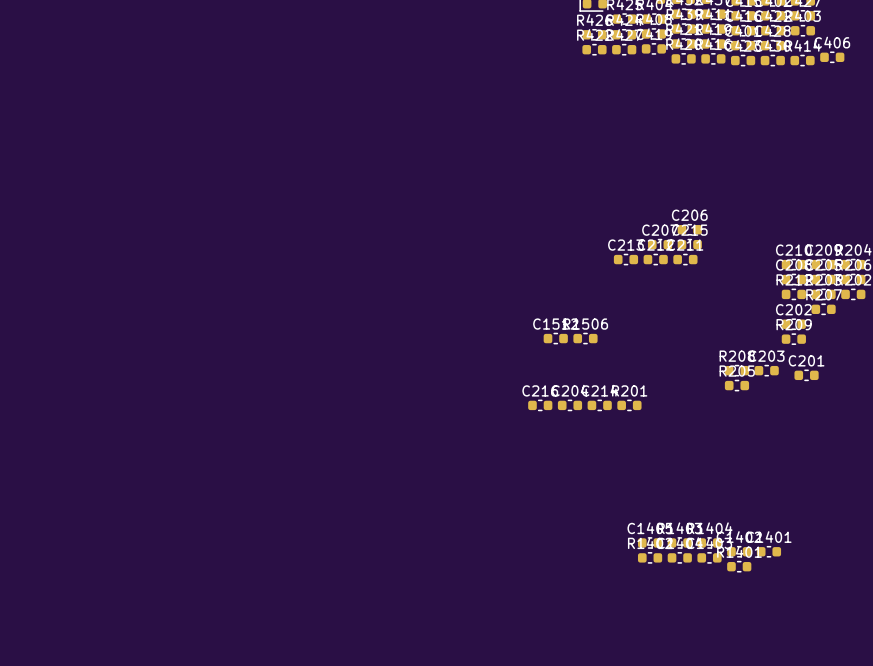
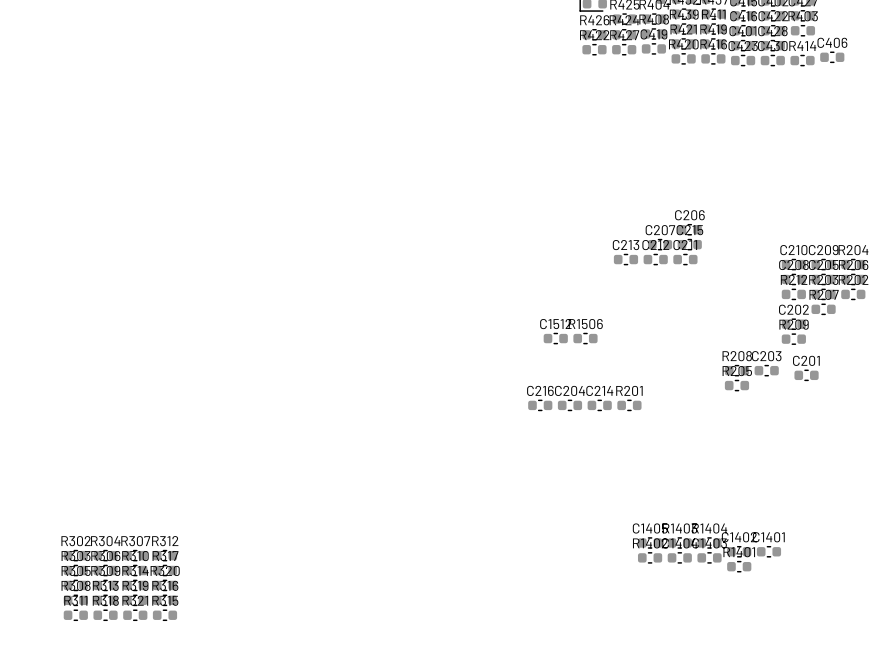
R302: none -> (75, 555)
R304: none -> (105, 555)
R307: none -> (135, 555)
R312: none -> (164, 555)
R303: none -> (75, 570)
R306: none -> (105, 570)
R310: none -> (135, 570)
R317: none -> (164, 570)
R305: none -> (75, 585)
R309: none -> (105, 585)
R314: none -> (135, 585)
R320: none -> (164, 585)
R308: none -> (75, 600)
R313: none -> (105, 600)
R319: none -> (135, 600)
R316: none -> (164, 600)
R311: none -> (75, 615)
R318: none -> (105, 615)
R321: none -> (135, 615)
R315: none -> (164, 615)

